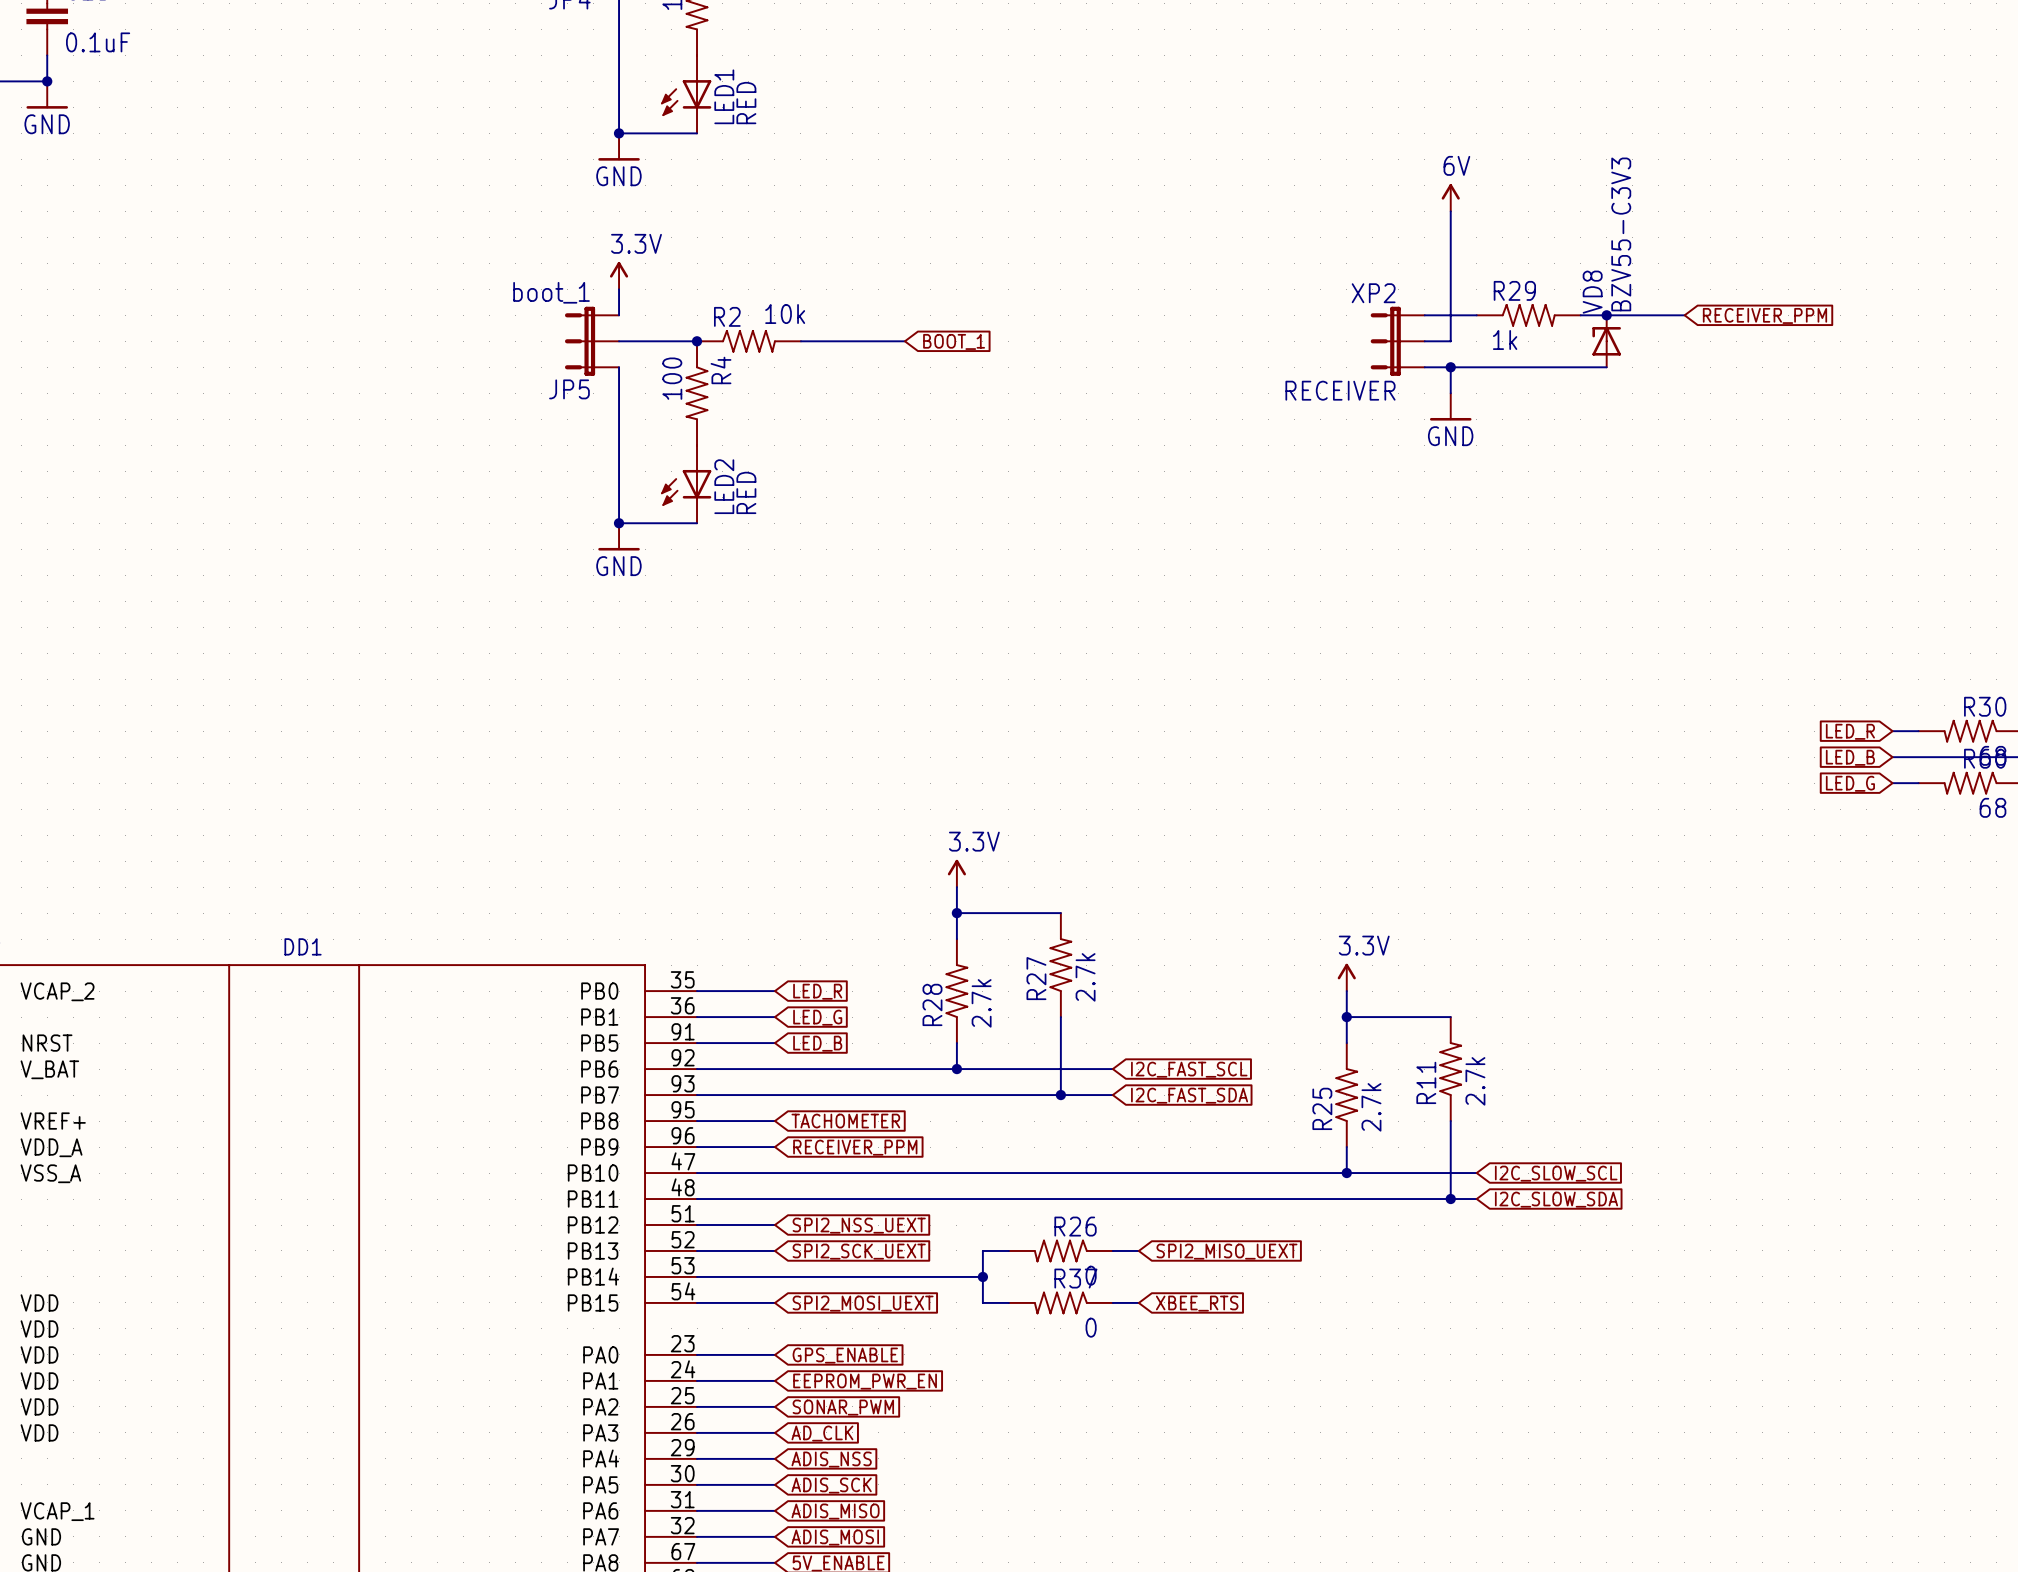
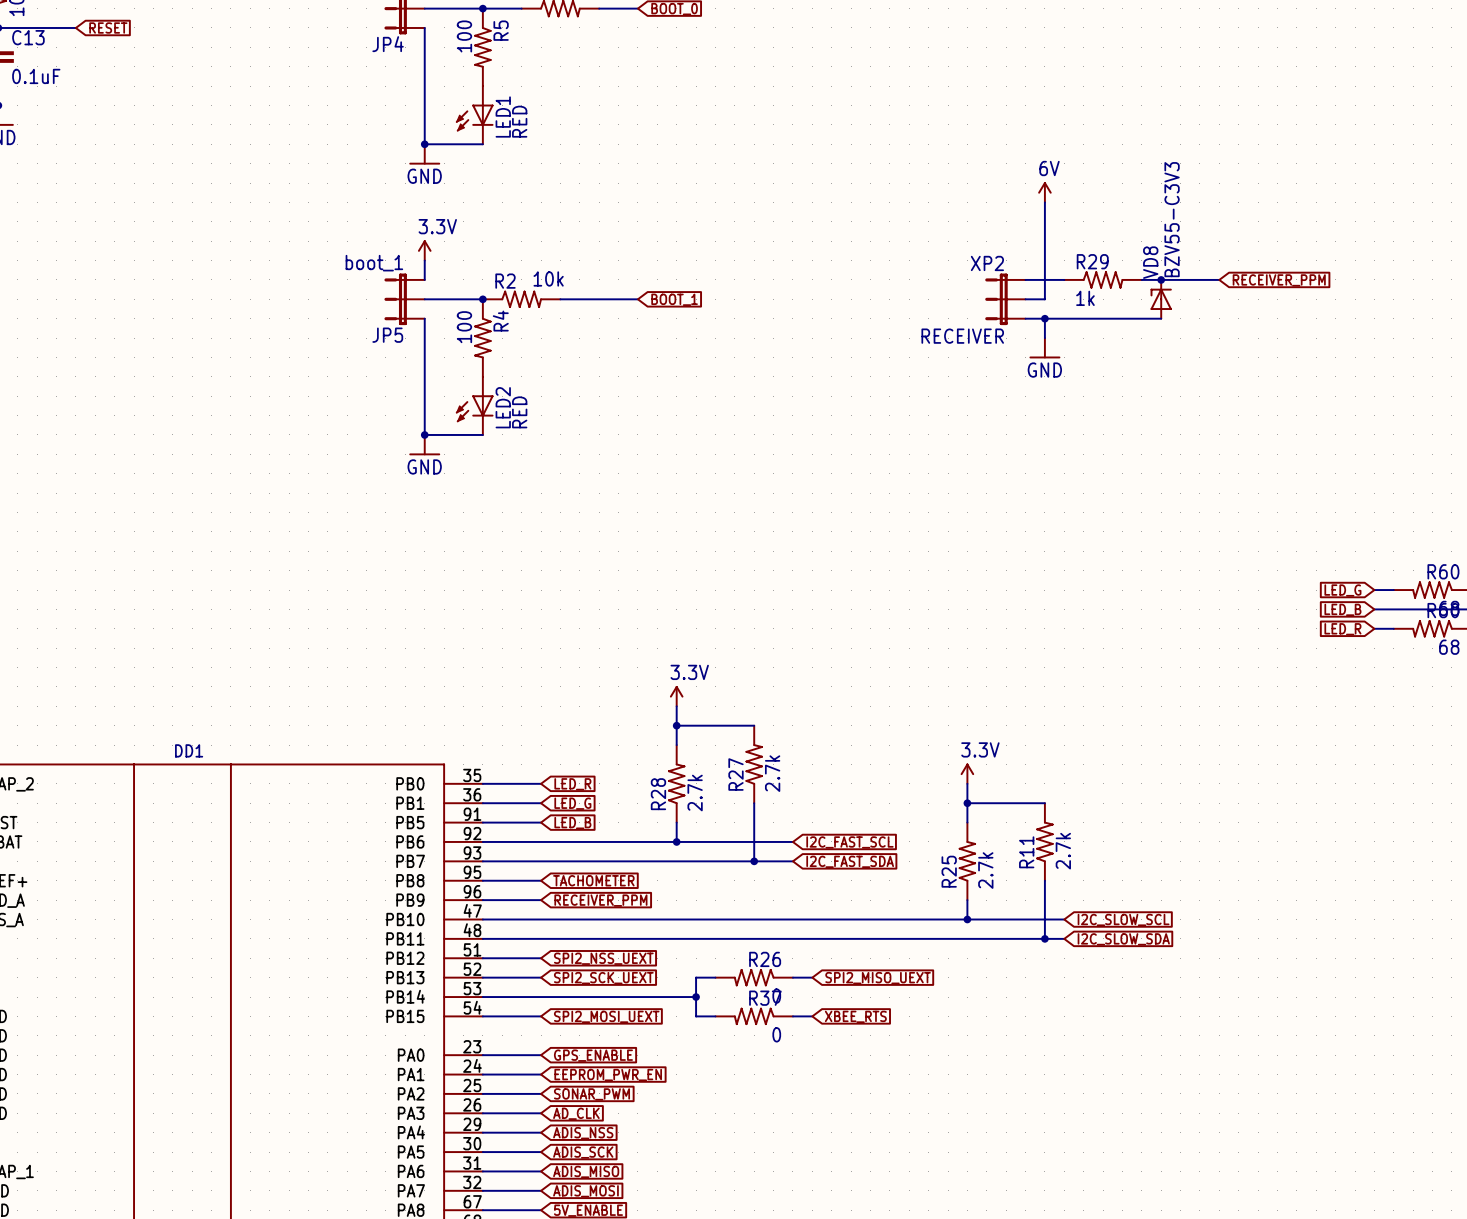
R30 name: R30 (1985, 706) -> R60 (1443, 571)
global label: LED_R (1850, 731) -> LED_G (1342, 590)
global label: LED_G (1850, 783) -> LED_R (1342, 629)

